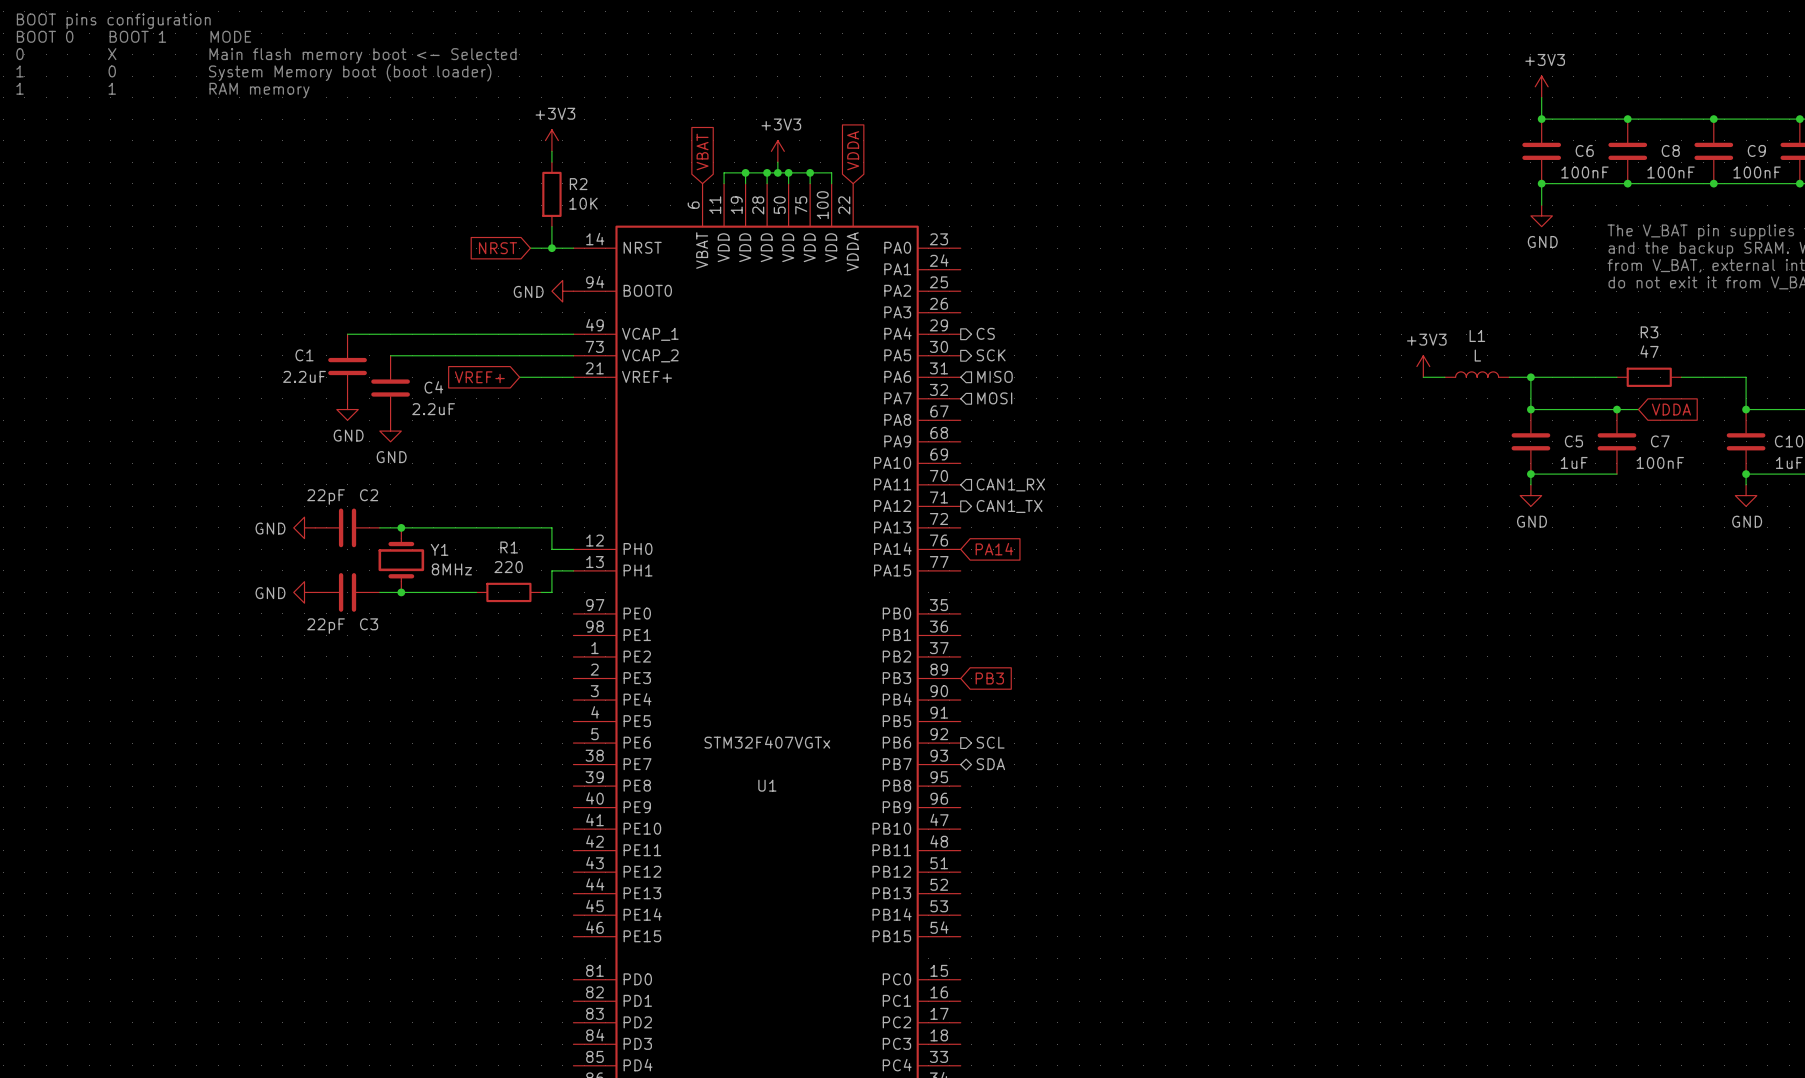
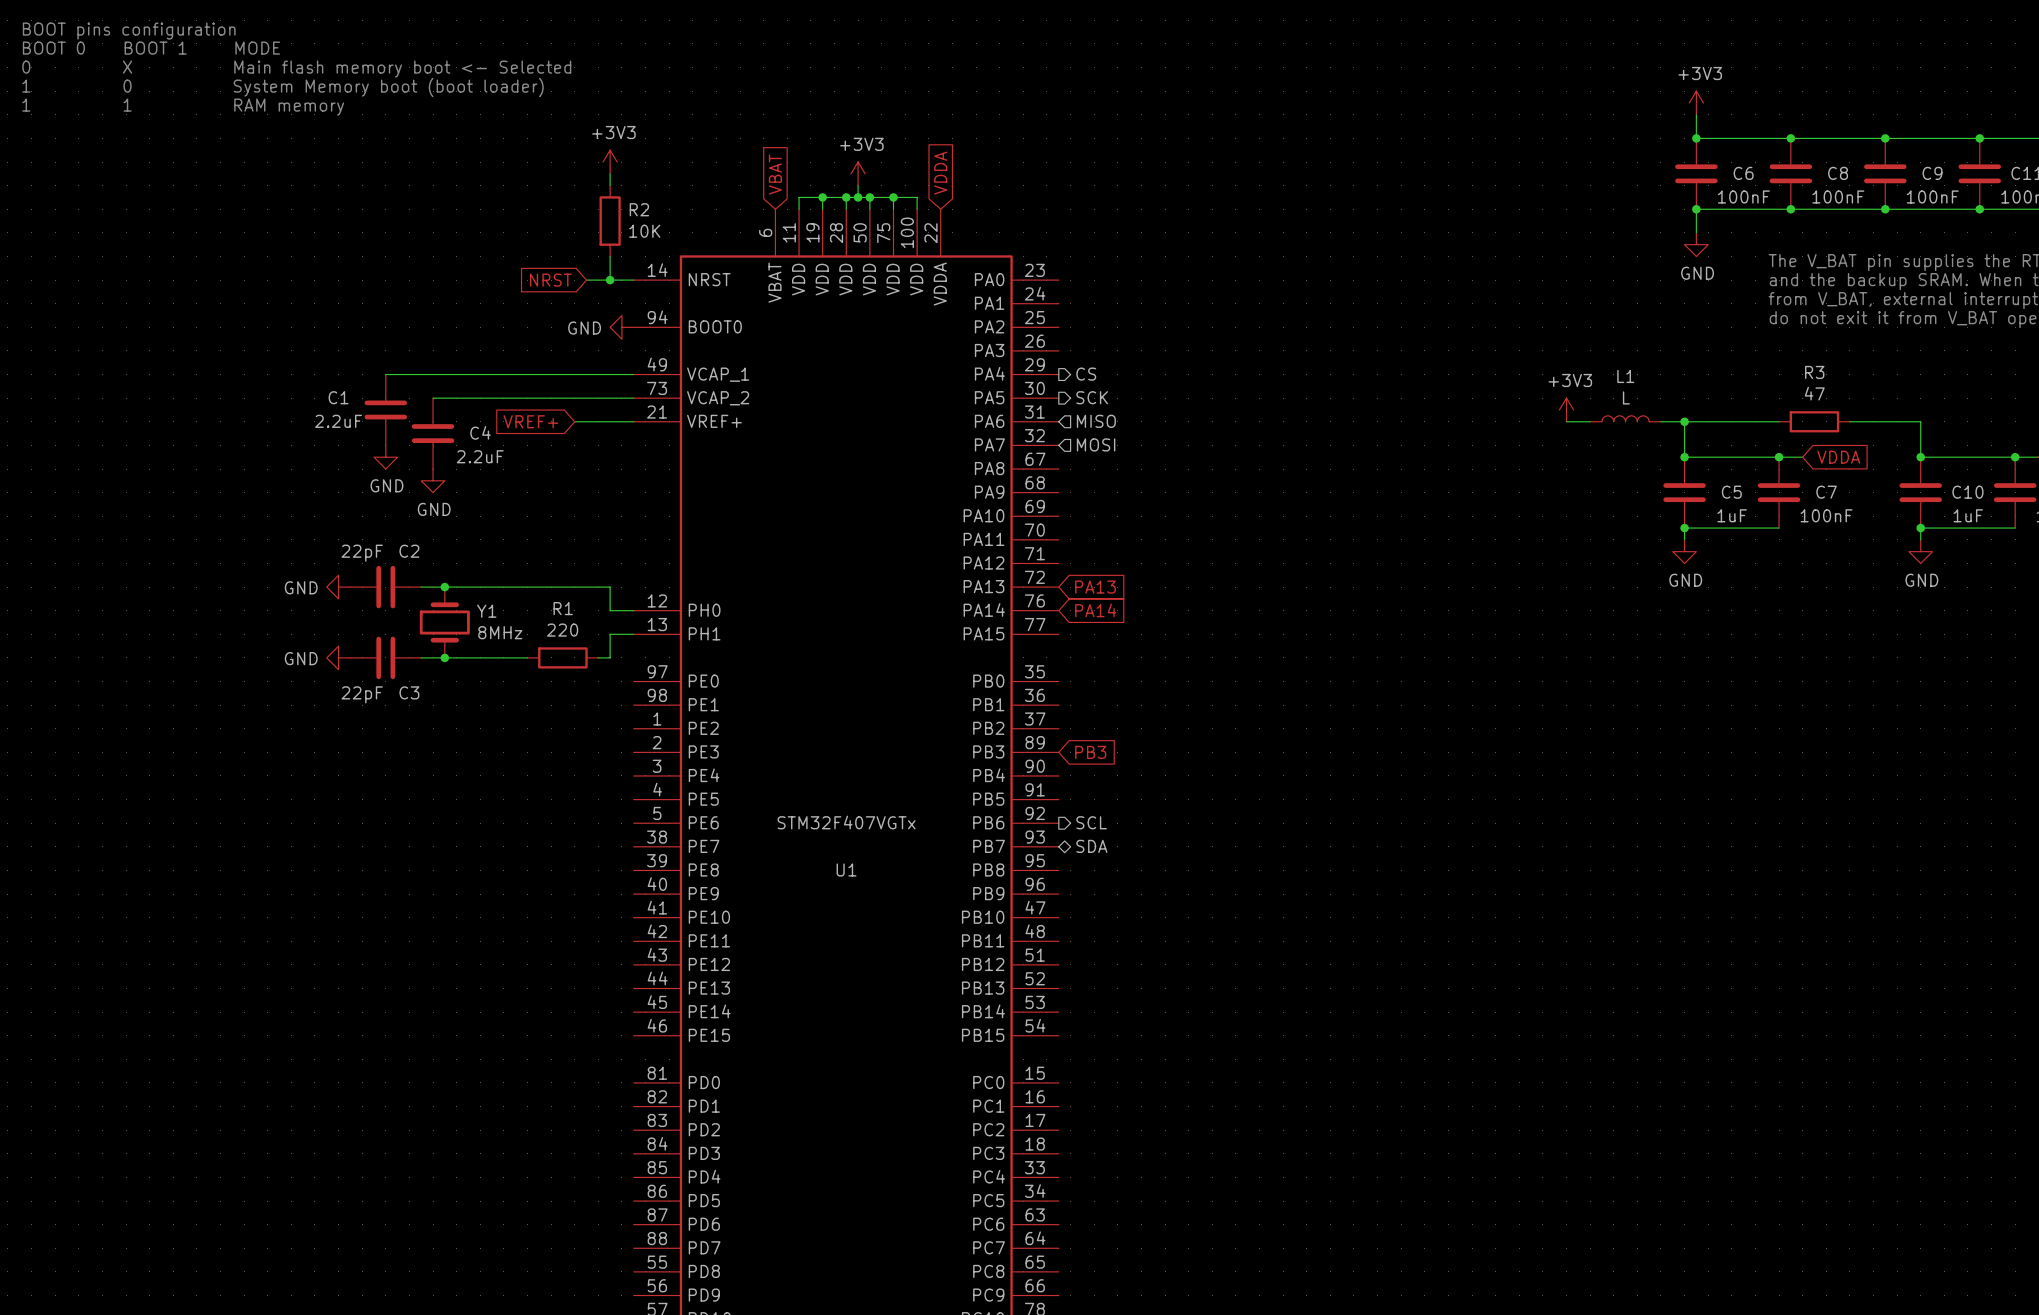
hierarchical label: CAN1_RX (1010, 484) -> none
hierarchical label: CAN1_TX (1009, 506) -> none
global label: none -> PA13 (1095, 587)

